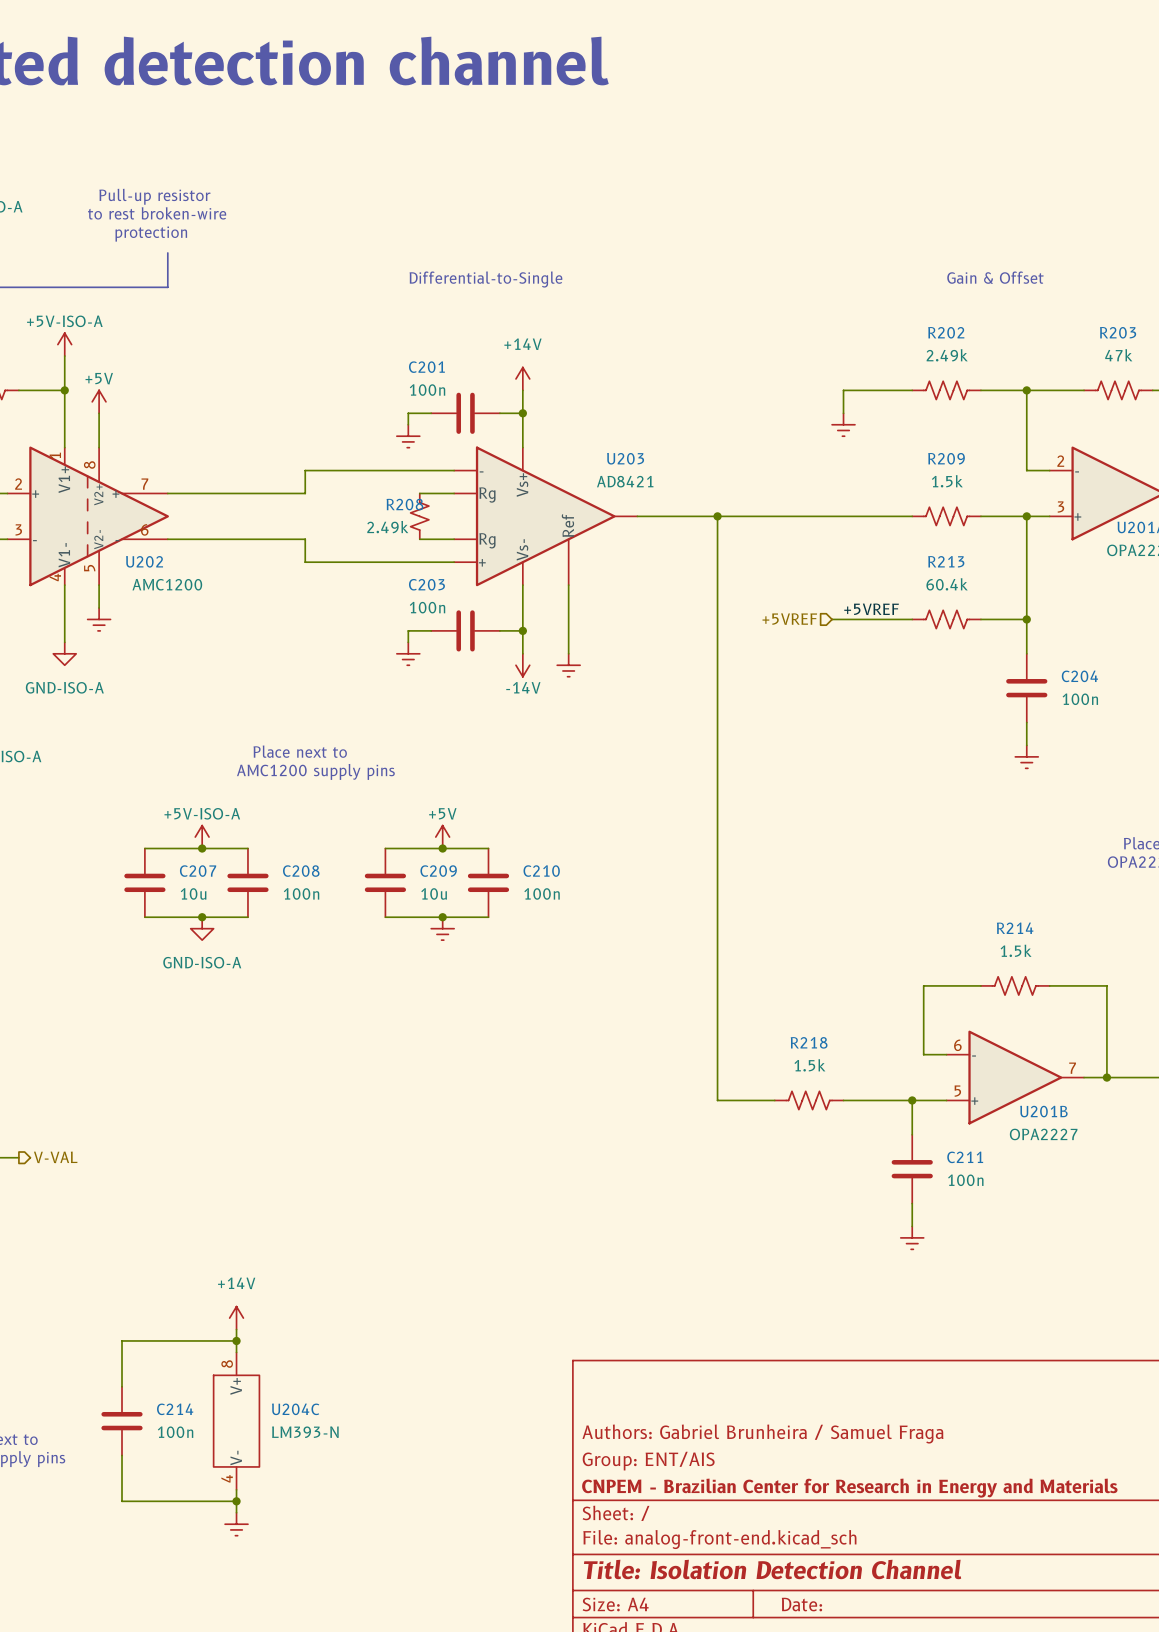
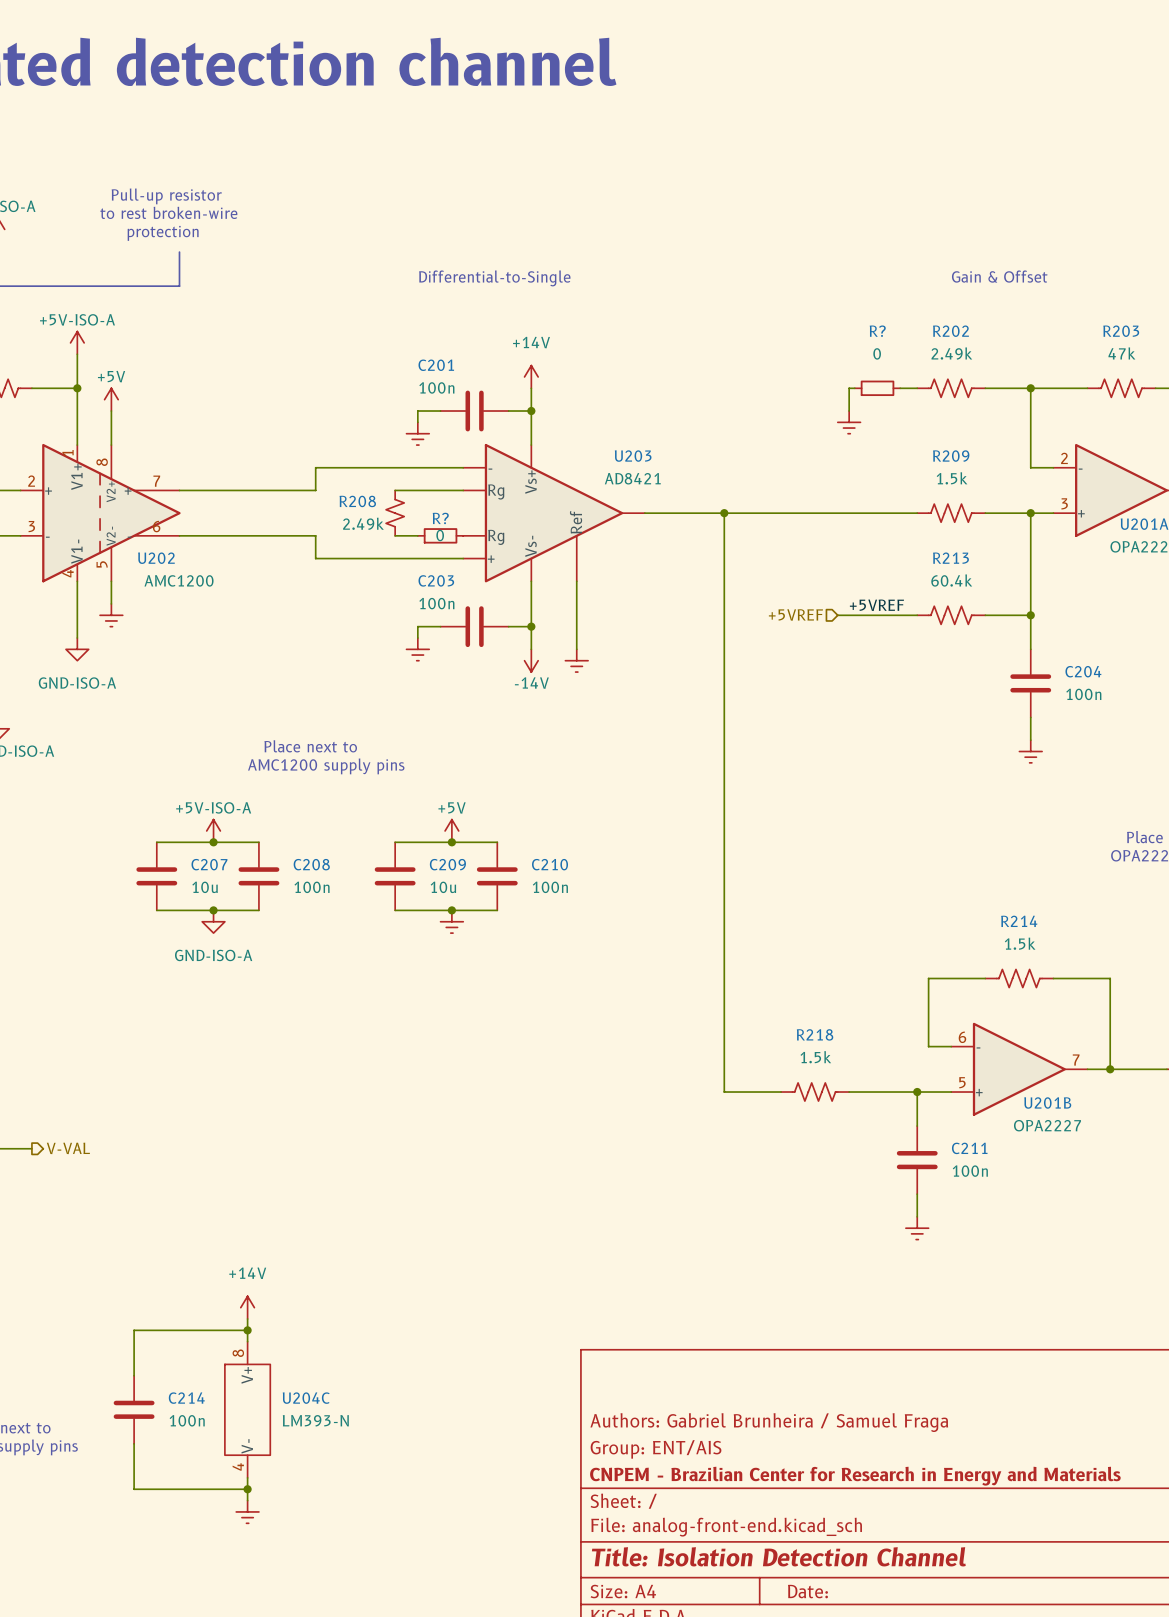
wire: (849, 390) (895, 390) -> none
R?: none -> 0 (877, 388)
R208 name position: R208 (404, 504) -> R208 (357, 501)
R208 position: (419, 516) -> (395, 513)
wire: none -> (395, 535) (417, 535)
wire: (419, 539) (454, 539) -> (395, 490) (429, 490)
R?: none -> 0 (440, 535)

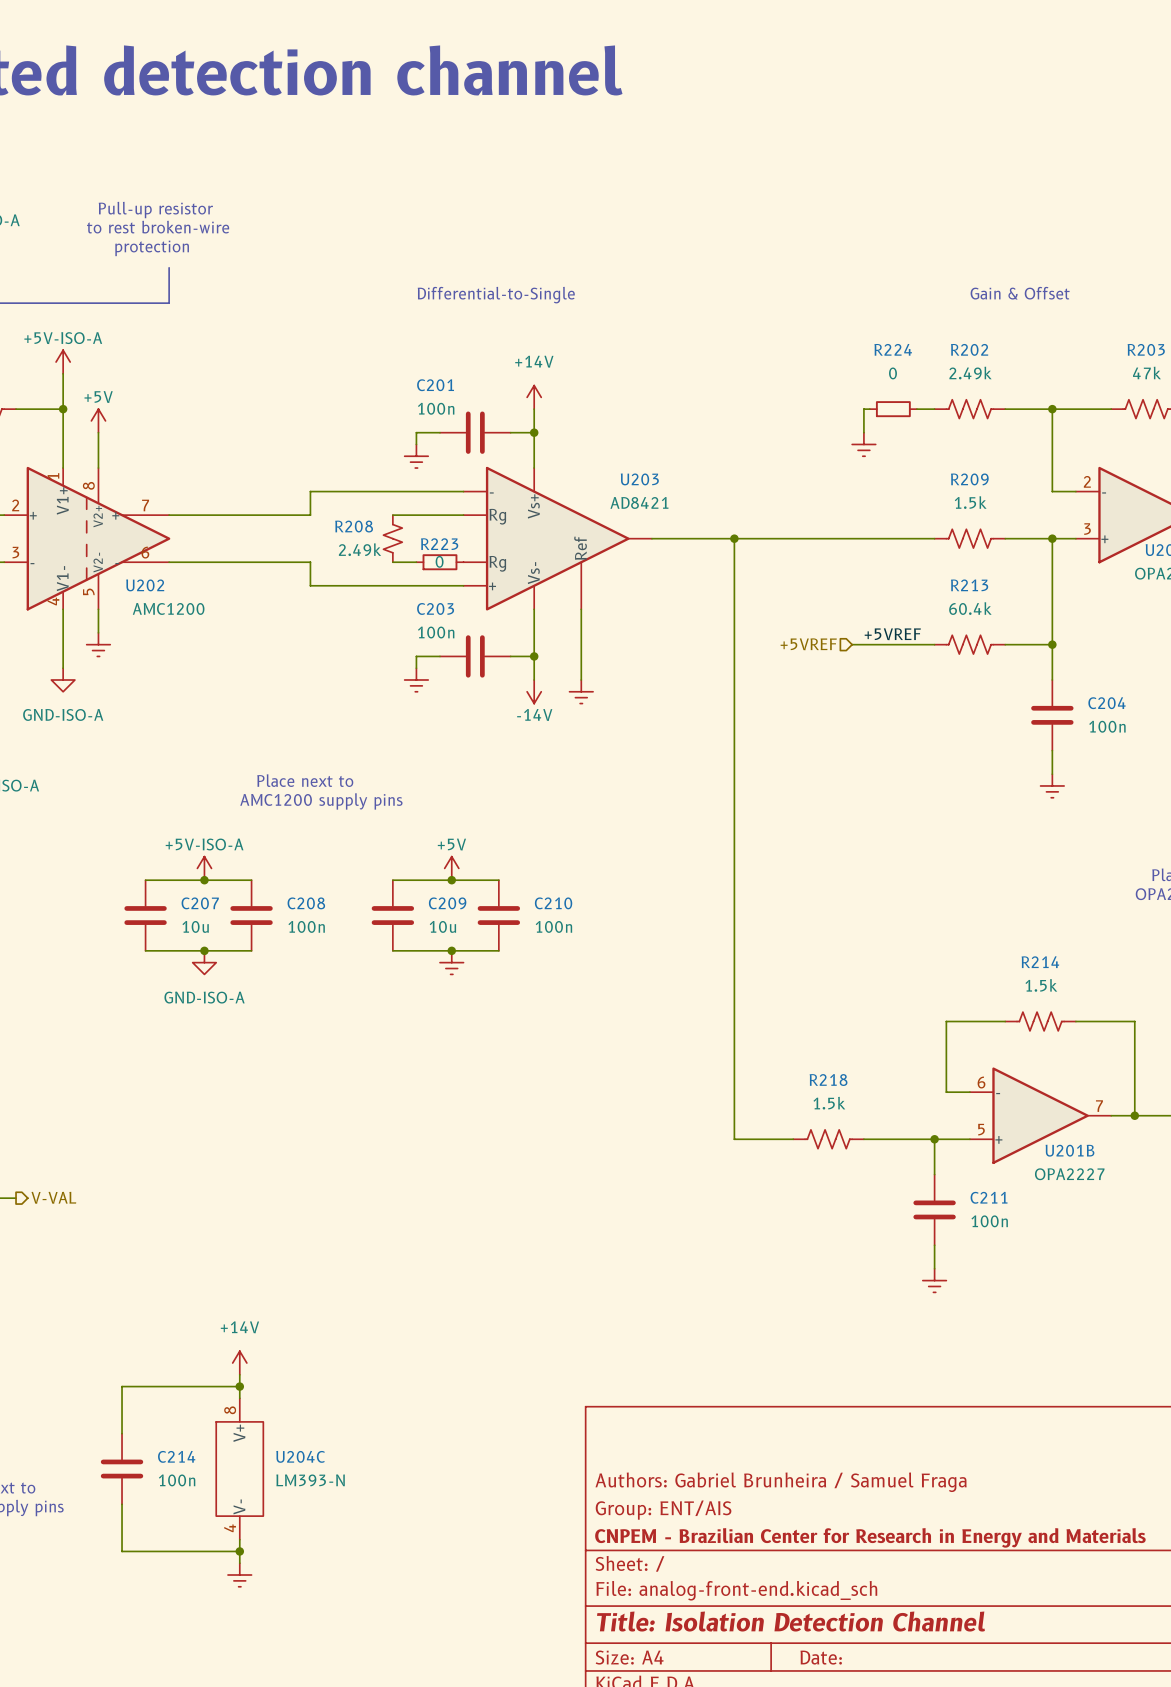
R? name: R? (877, 331) -> R224 (893, 349)
R? name: R? (440, 518) -> R223 (439, 544)

